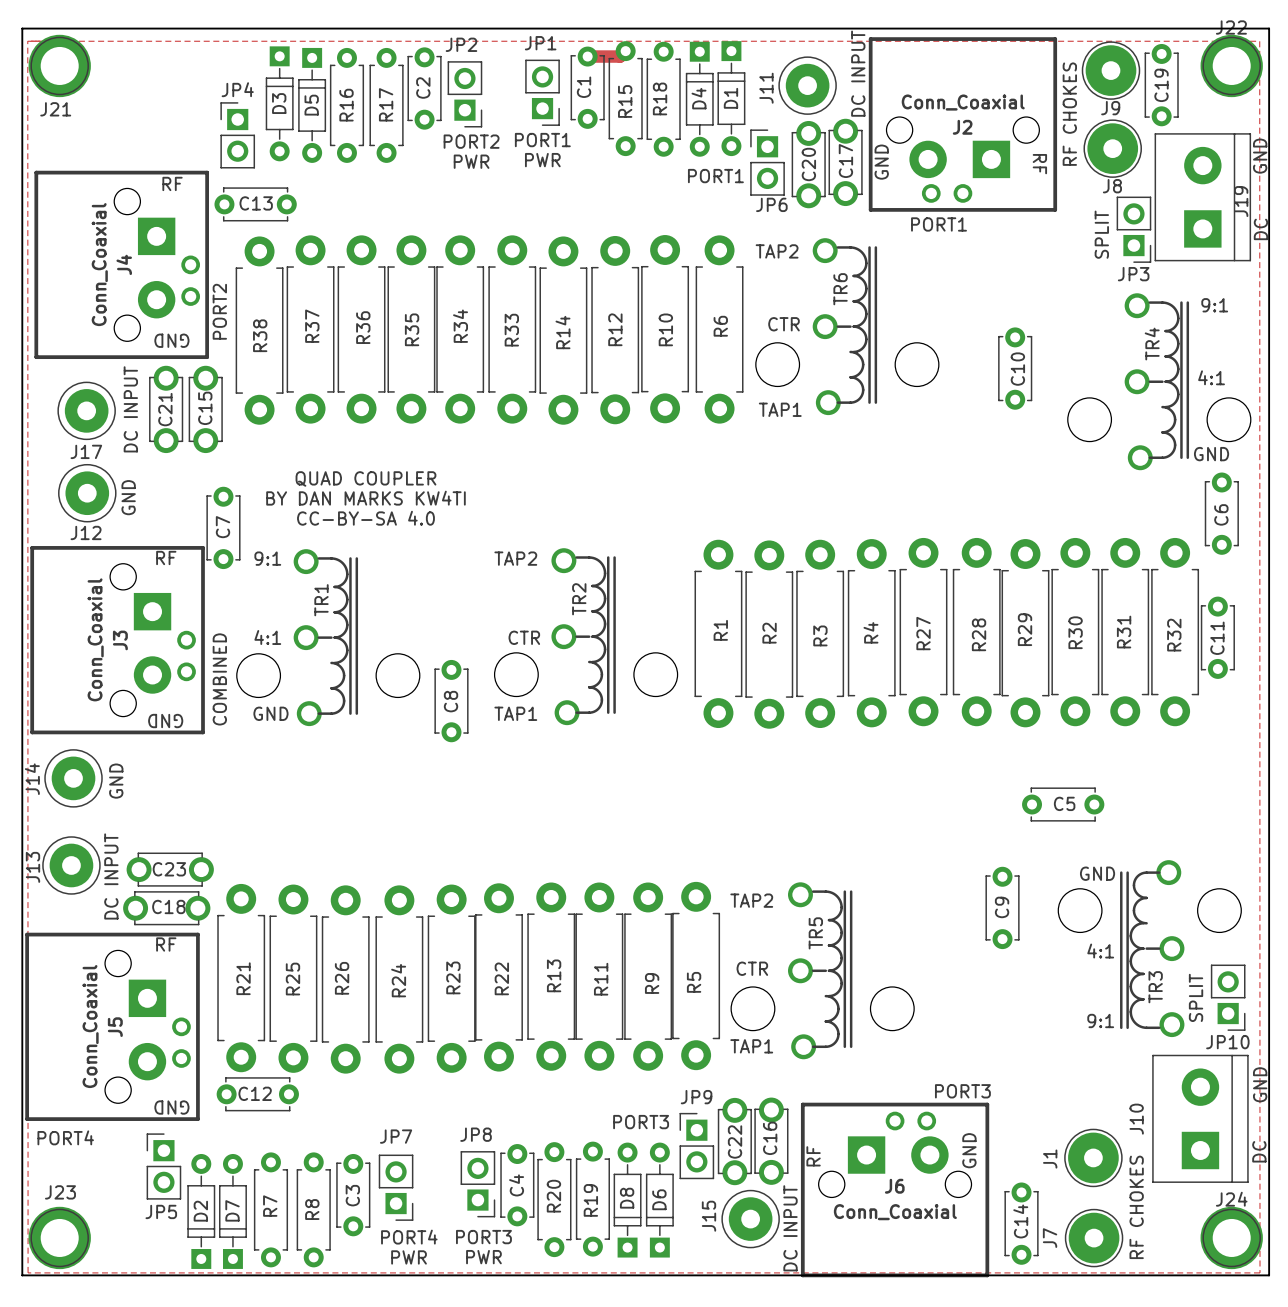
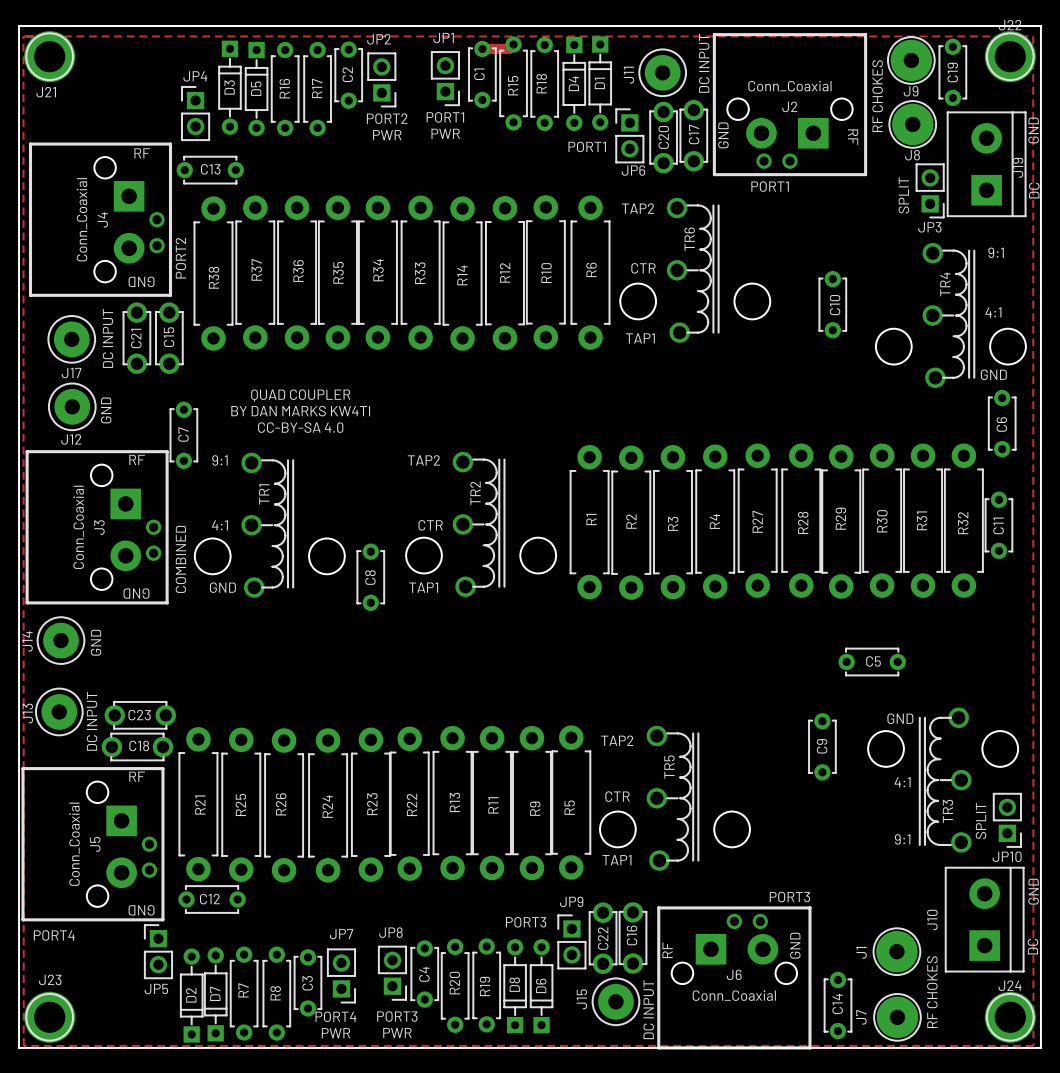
JP5 position: (163, 1166) -> (158, 951)
JP7 position: (396, 1187) -> (341, 975)
C3 position: (353, 1195) -> (307, 982)
R7 position: (270, 1209) -> (244, 993)
R8 position: (313, 1209) -> (276, 993)
D7 name: D7 (232, 1210) -> D2 (191, 995)
D7: none -> (215, 994)
D2: (201, 1211) -> none

